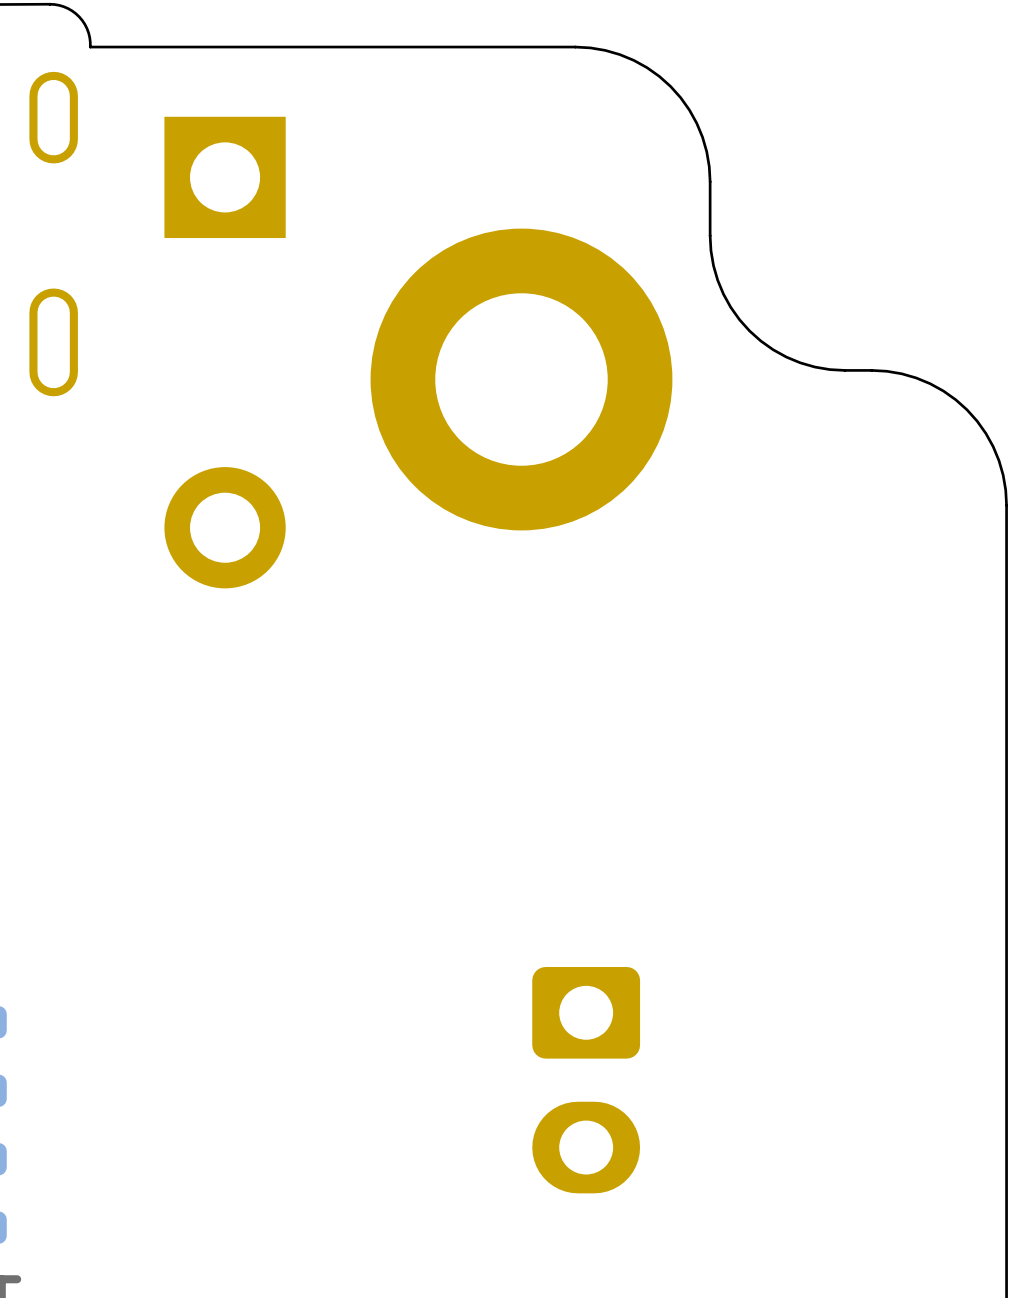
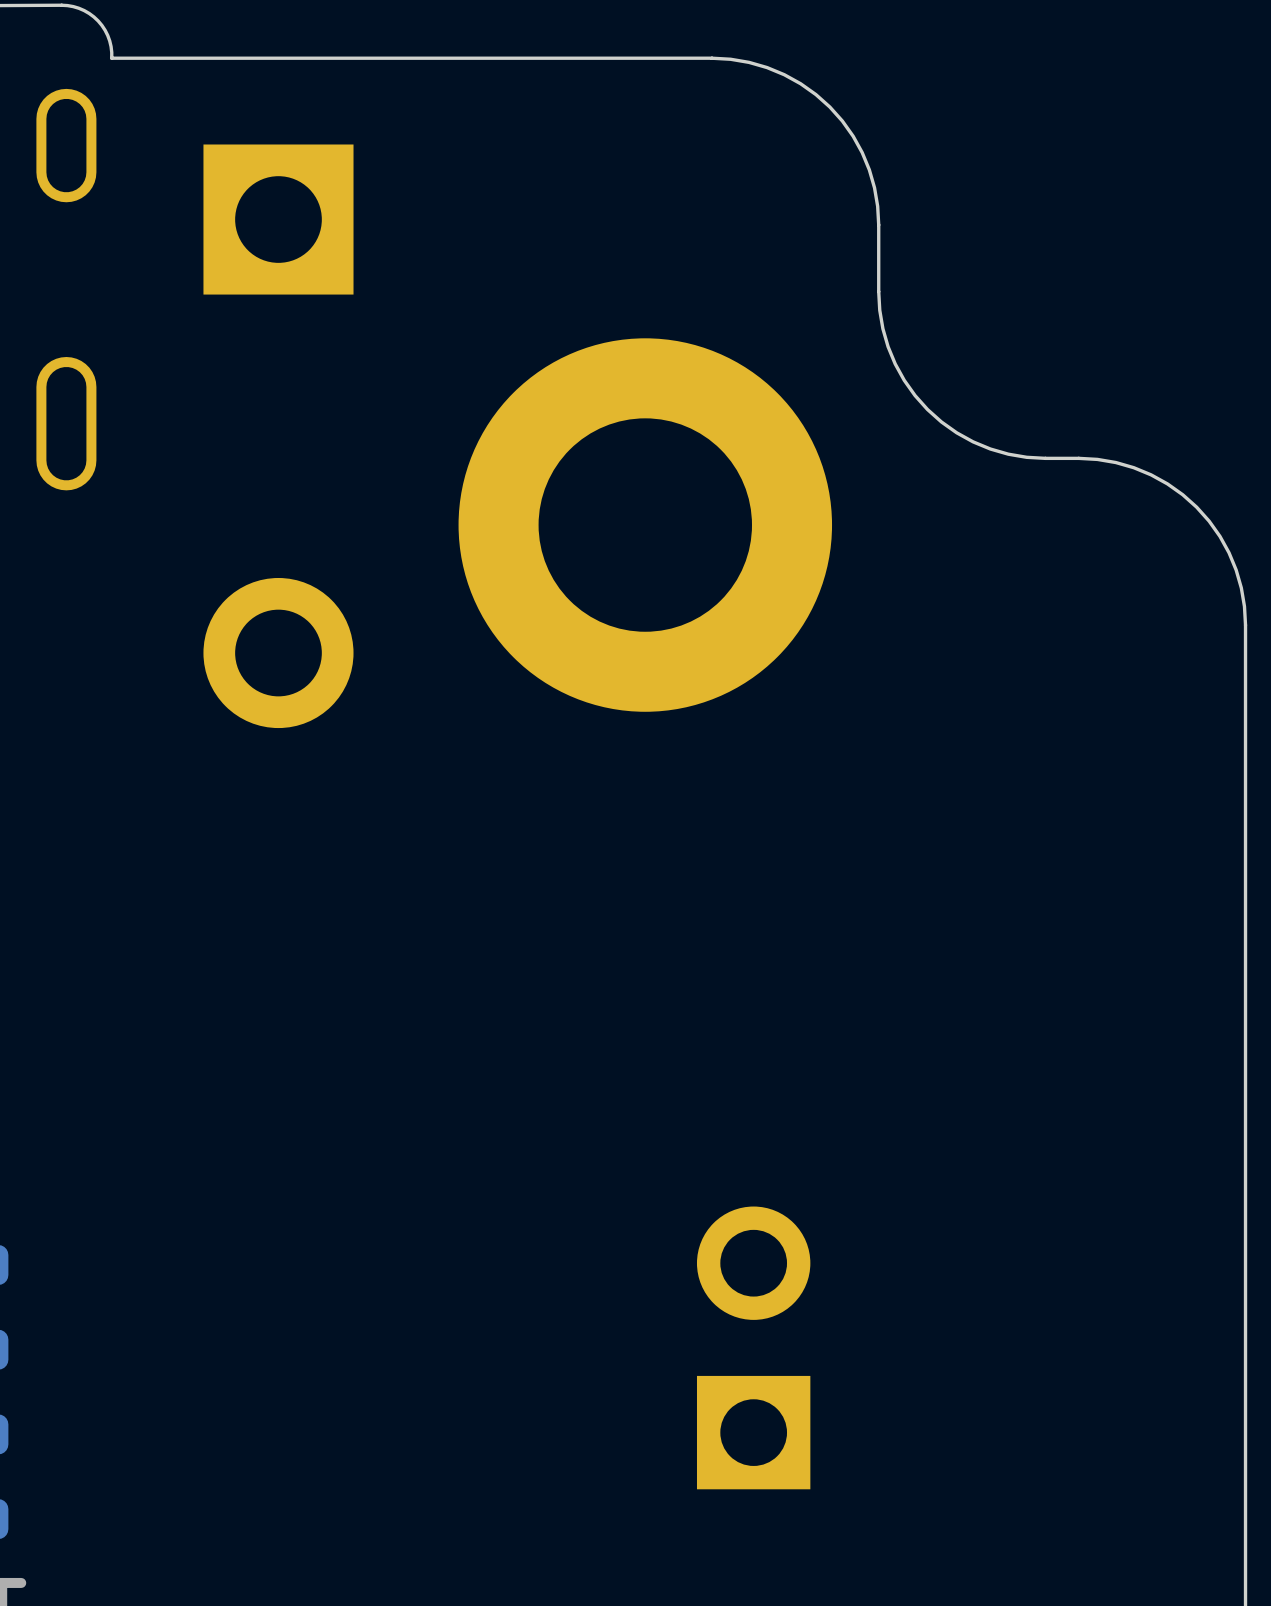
part position: (521, 379) -> (645, 525)
part footprint: [532, 966, 641, 1194] -> [696, 1206, 811, 1490]

